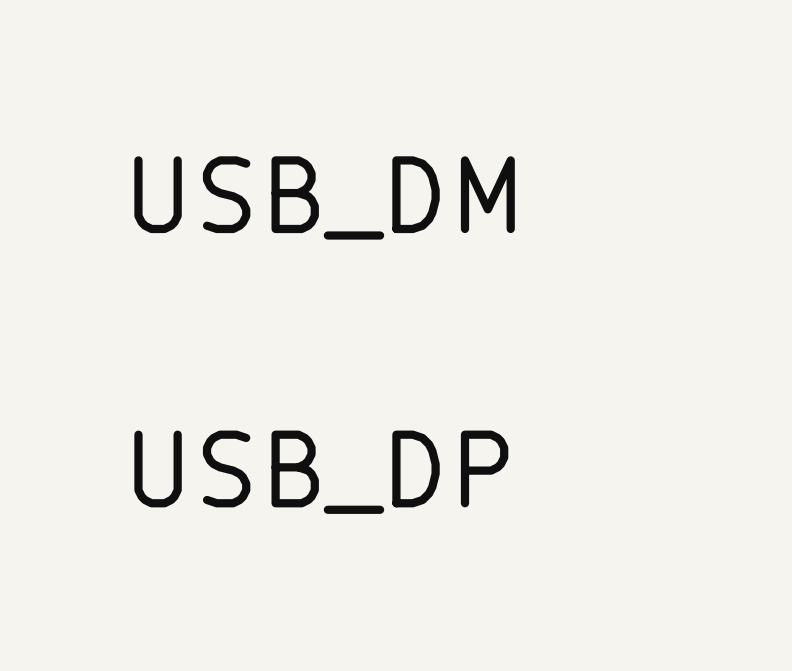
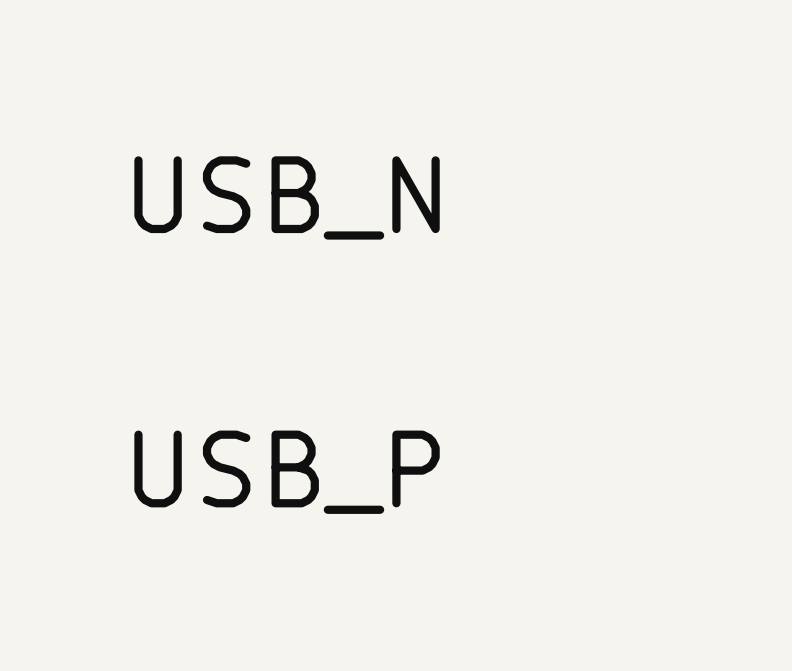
label: USB_DM (324, 197) -> USB_N (287, 197)
label: USB_DP (321, 472) -> USB_P (287, 472)

